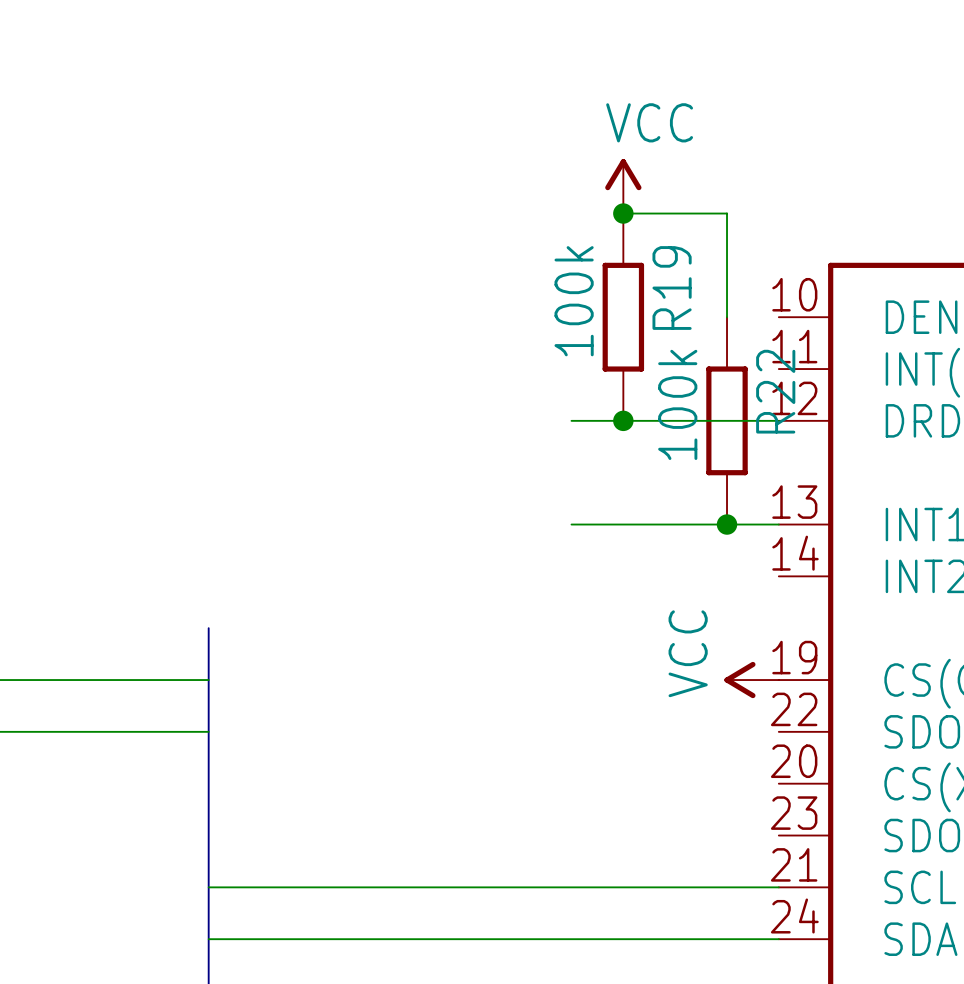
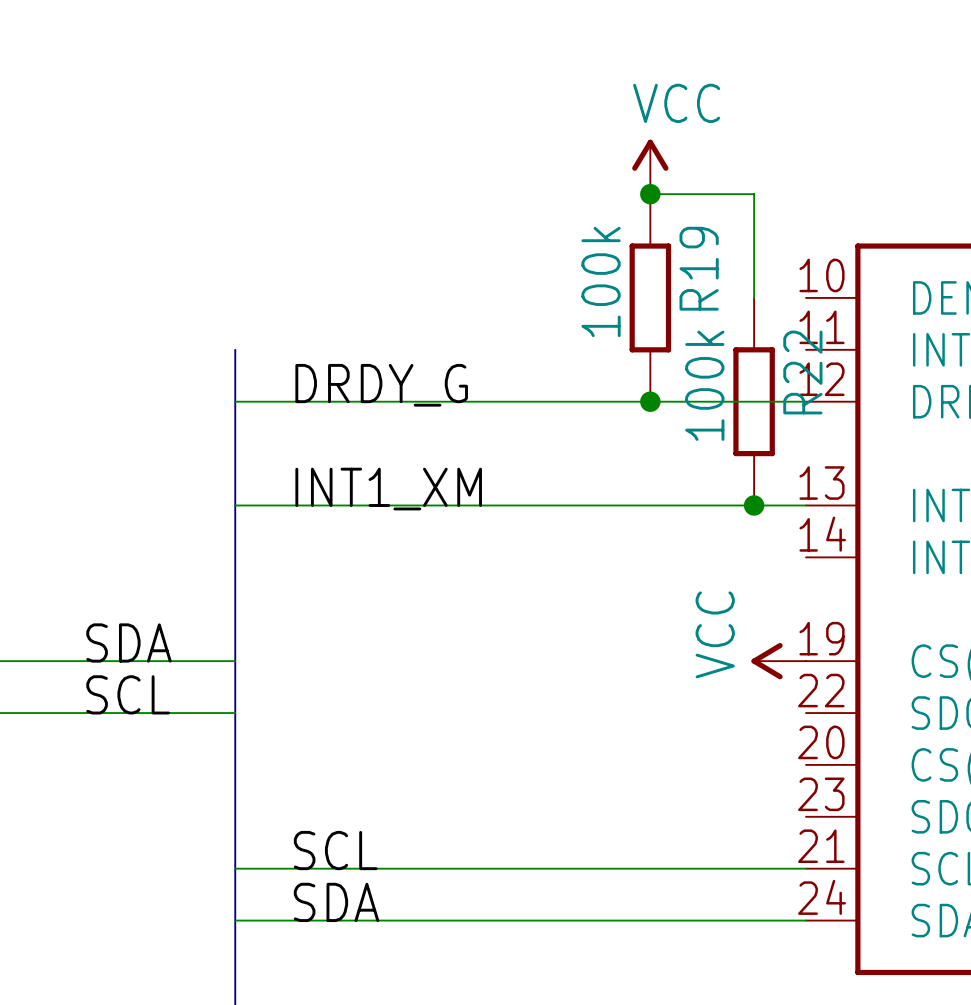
bus: none -> (235, 349) (235, 609)
label: none -> DRDY_G (381, 385)
wire: none -> (235, 401) (598, 401)
label: none -> INT1_XM (388, 489)
wire: none -> (235, 505) (598, 505)
label: none -> SDA (128, 642)
label: none -> SCL (128, 694)
label: none -> SCL (335, 850)
label: none -> SDA (336, 902)

